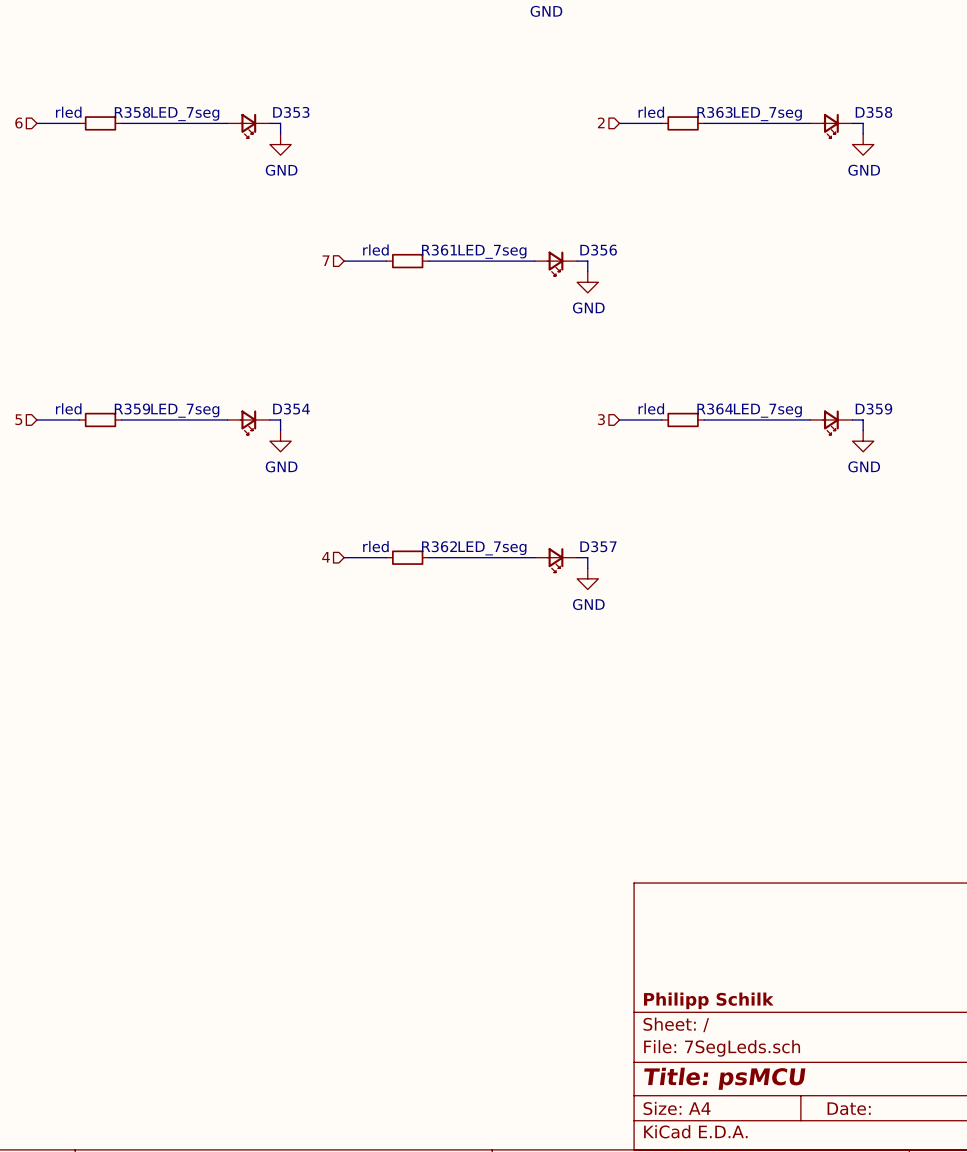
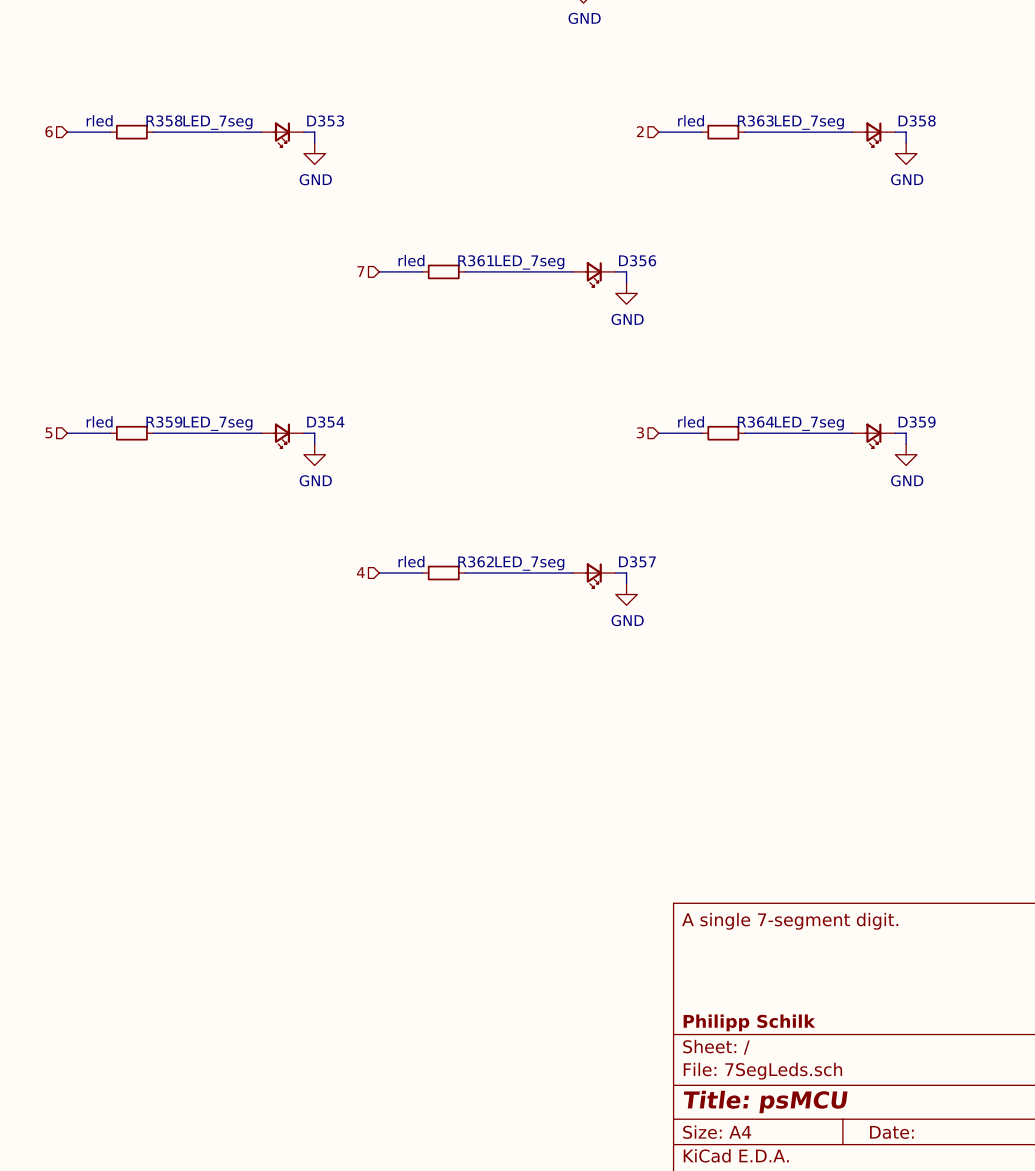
title block: none -> A single 7-segment digit. (790, 921)

